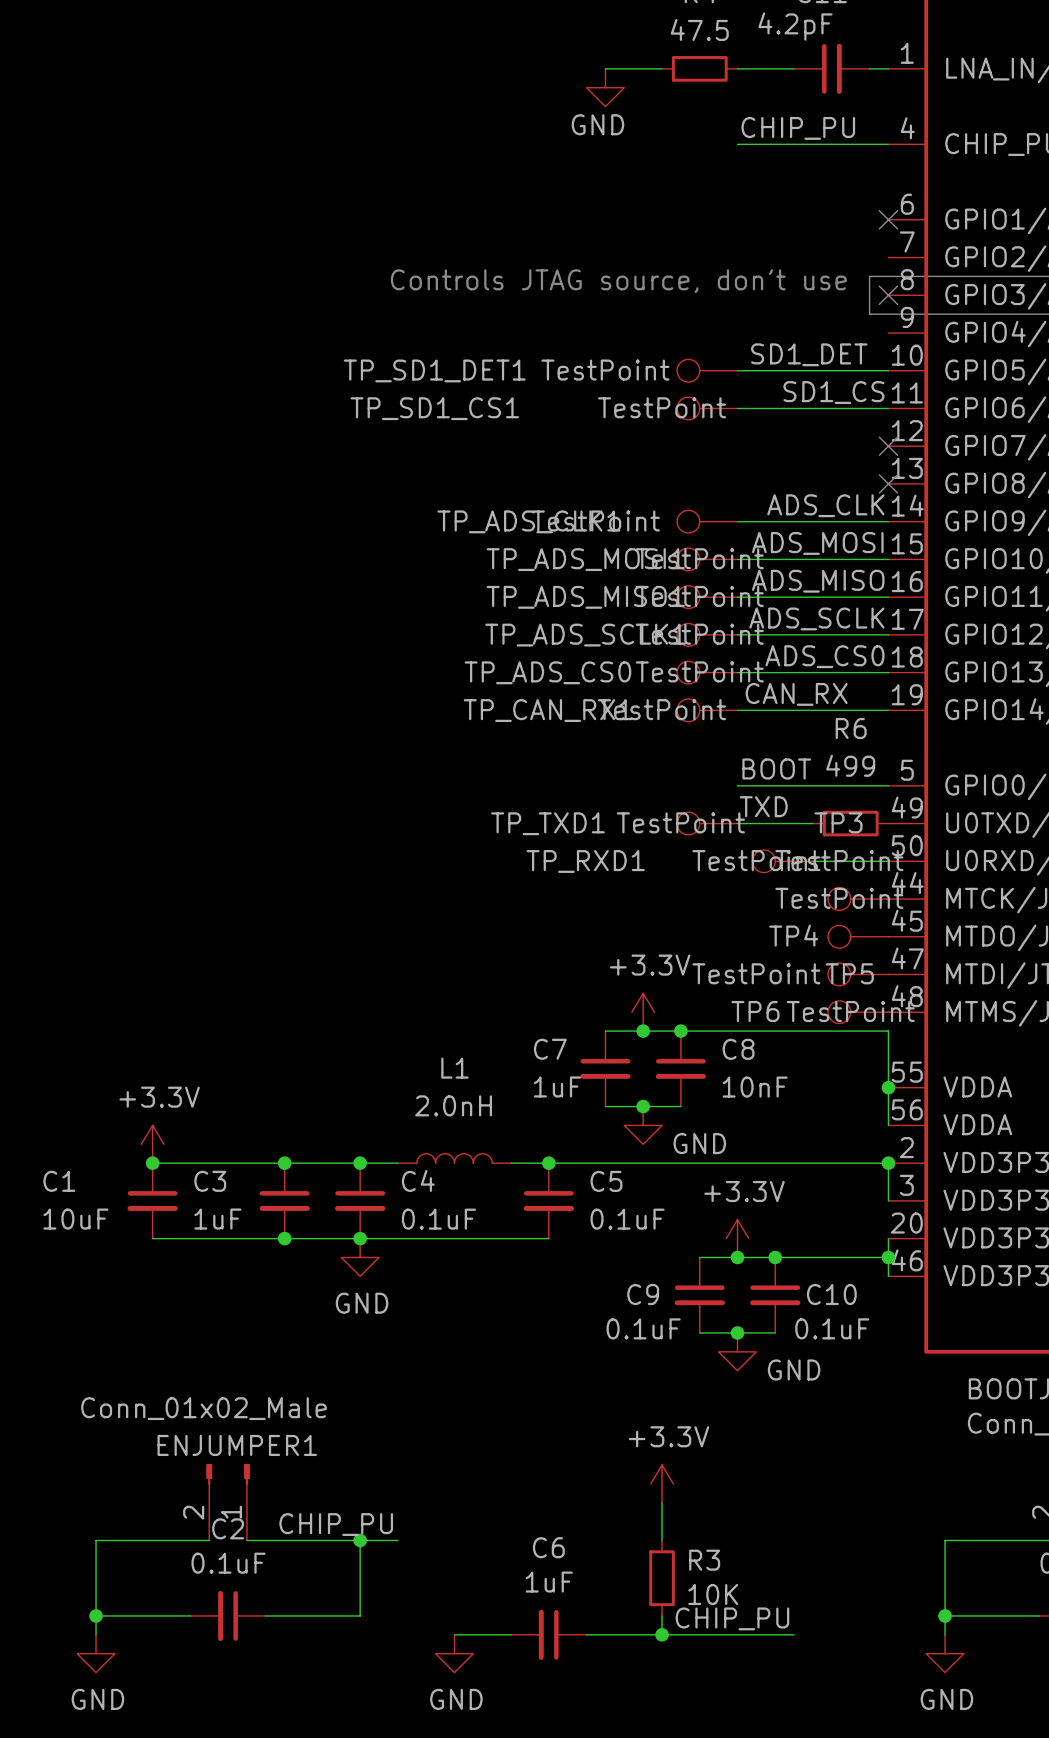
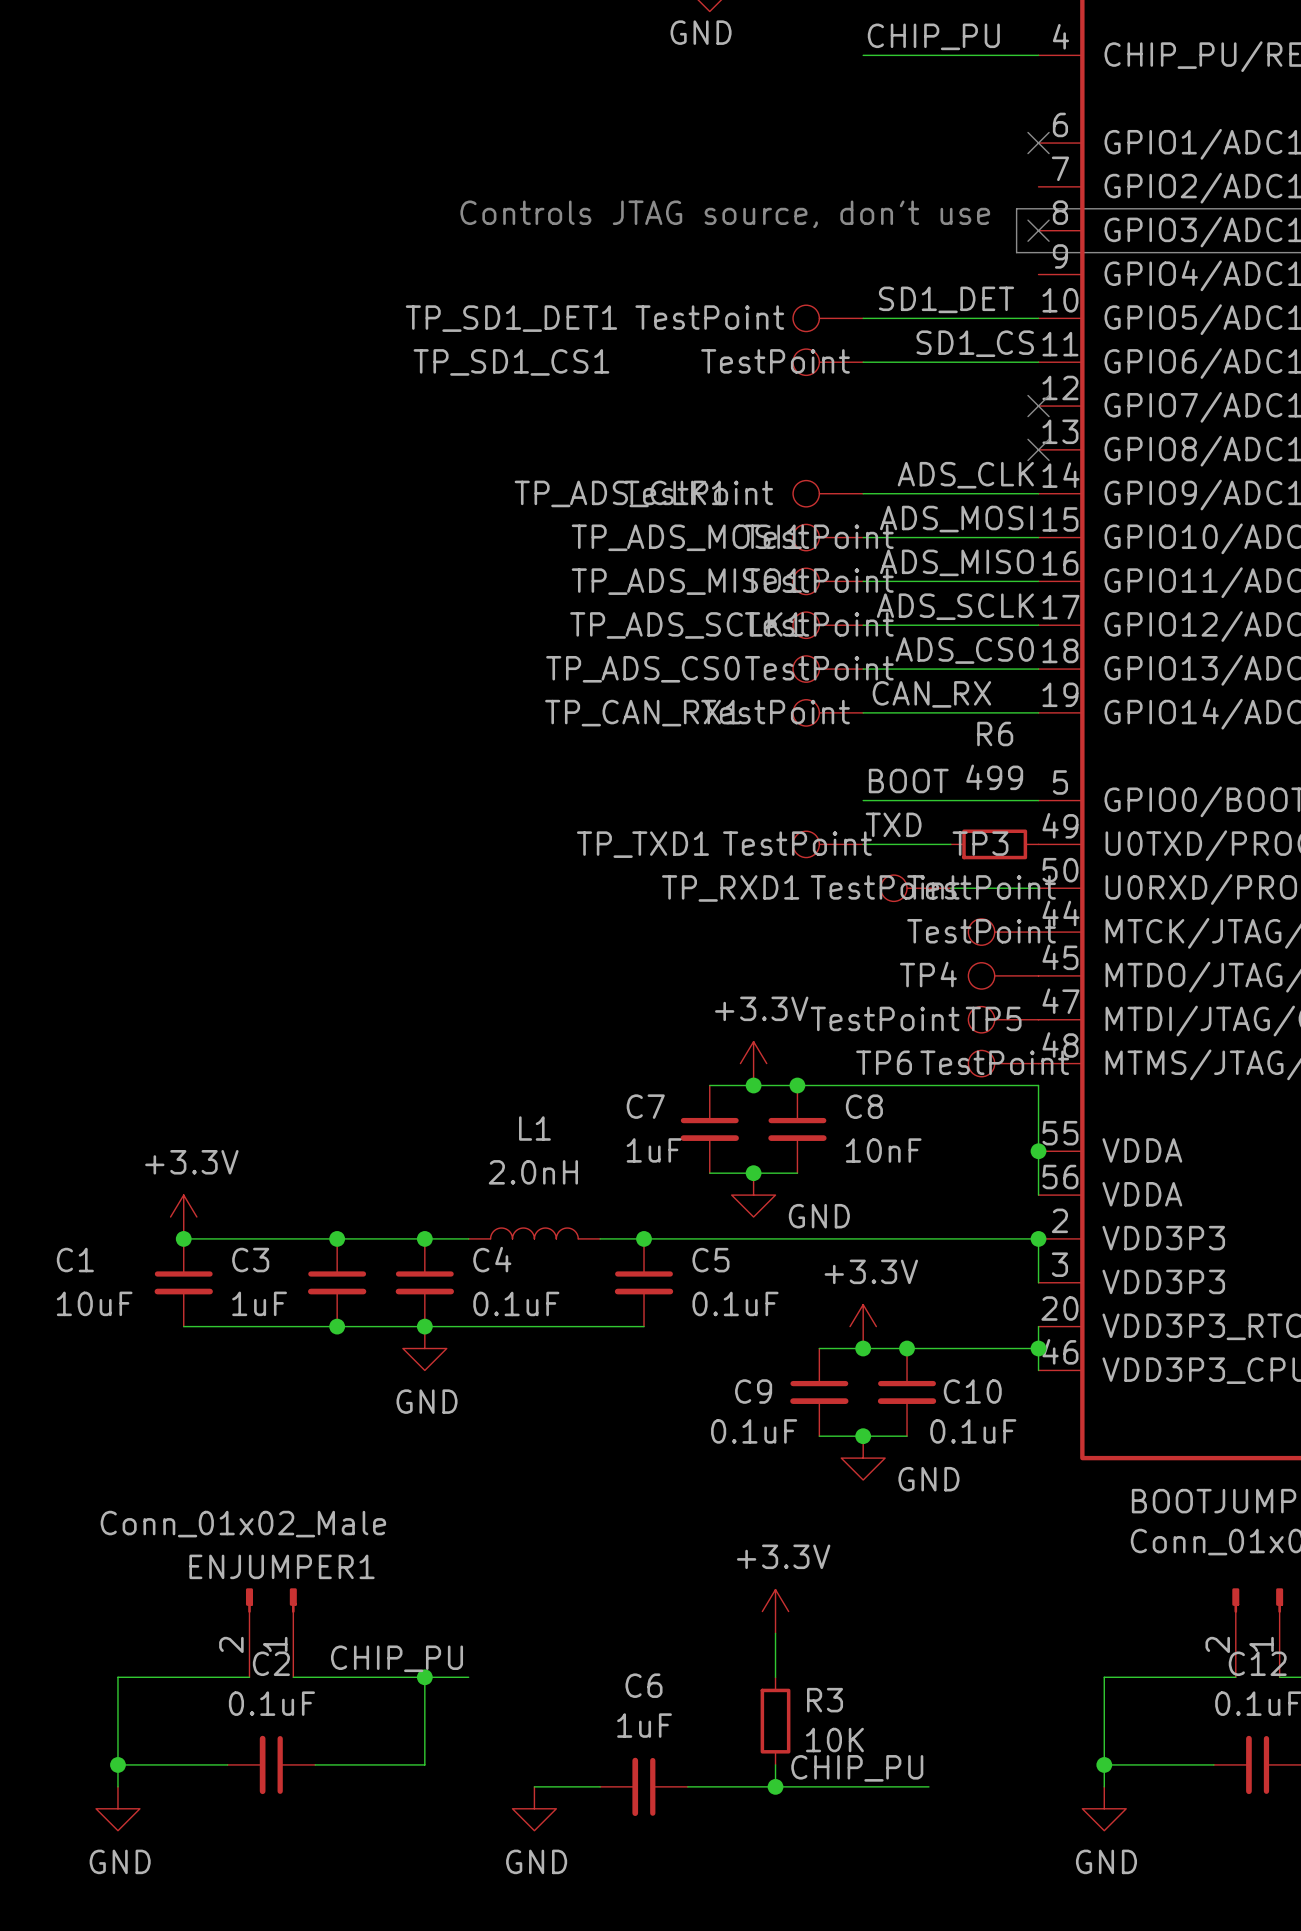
TP_RXD1 name position: TP_RXD1 (585, 861) -> TP_RXD1 (730, 888)

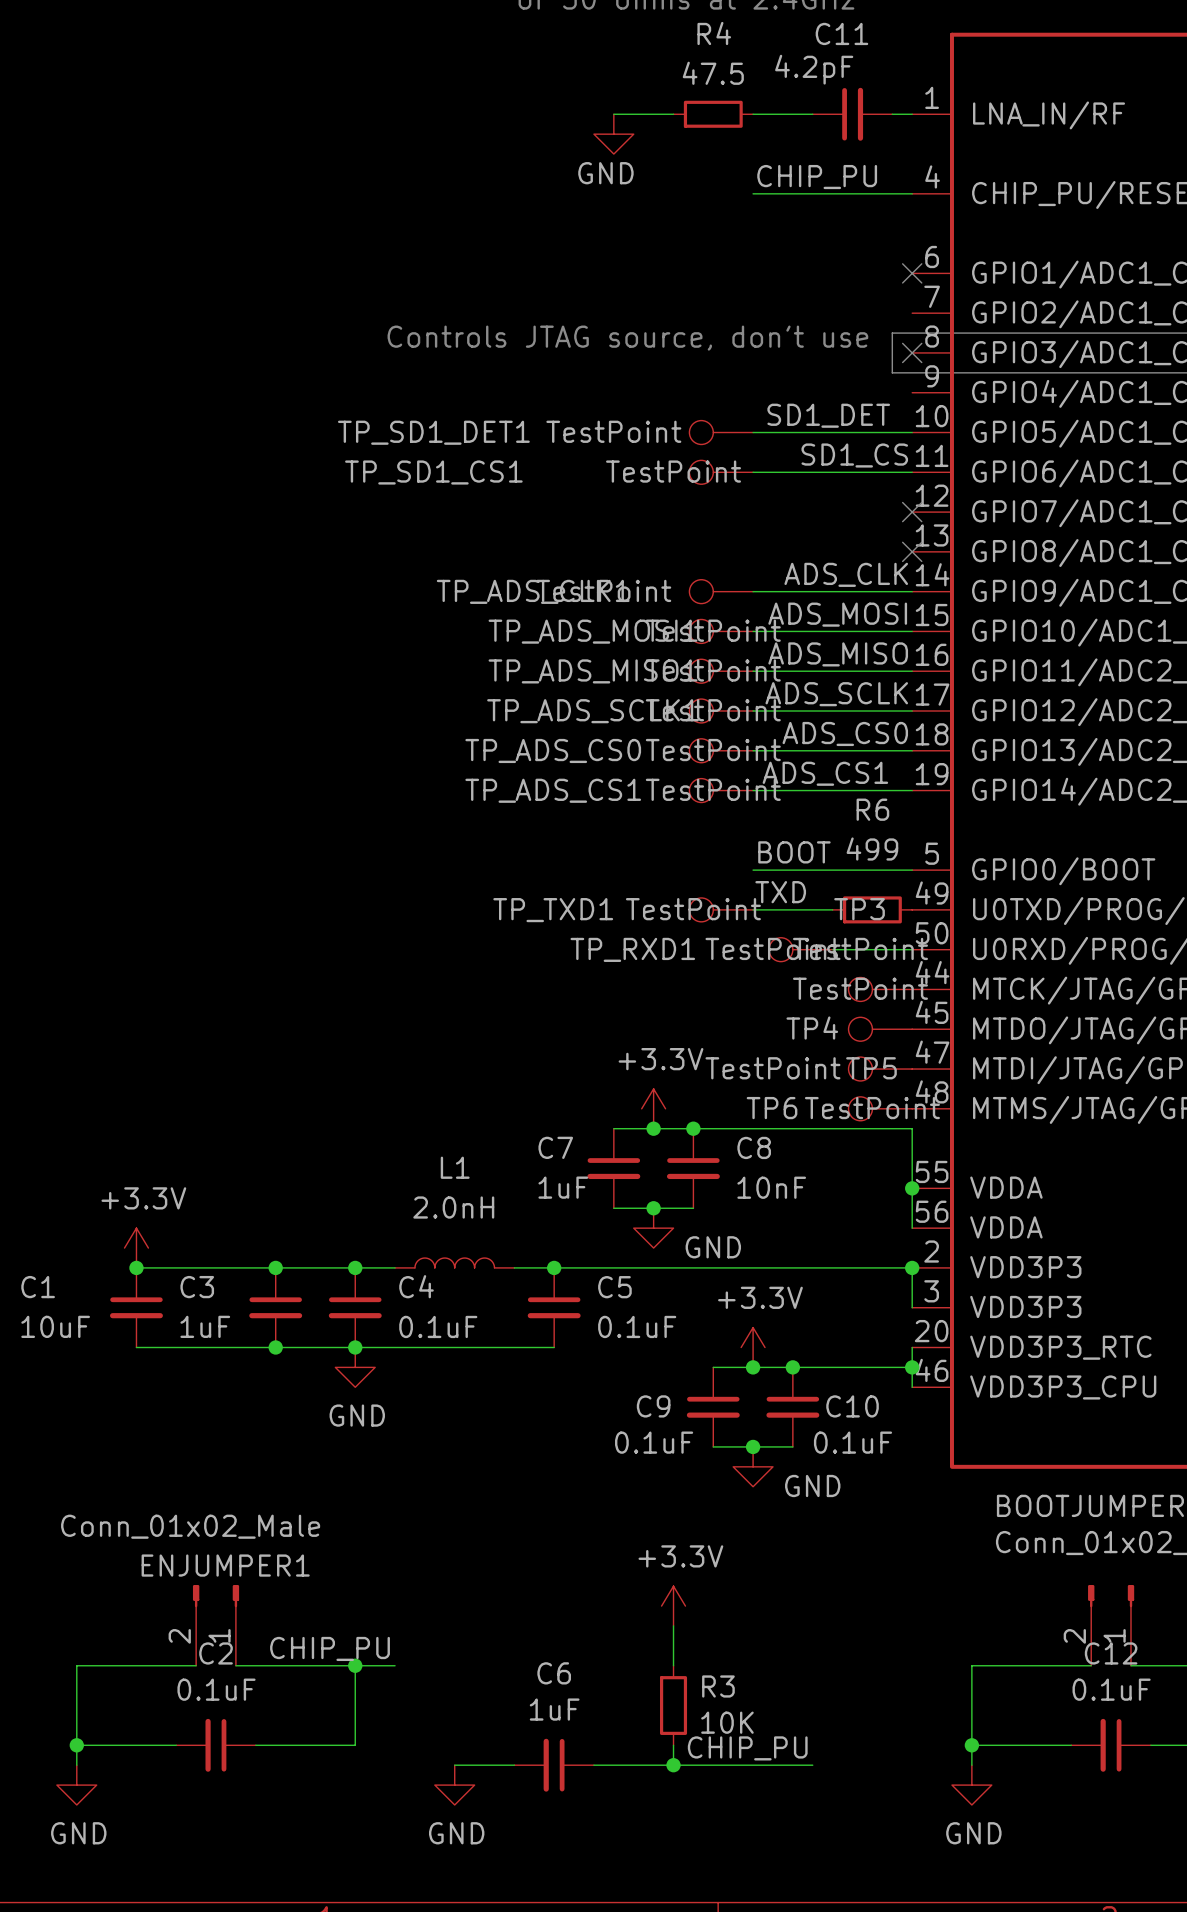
label: CAN_RX (931, 694) -> none
label: none -> ADS_CS1 (825, 773)
TP_CAN_RX1 value position: TestPoint (775, 712) -> TestPoint (713, 789)
TP_CAN_RX1 name: TP_CAN_RX1 (642, 713) -> TP_ADS_CS1 (553, 790)

